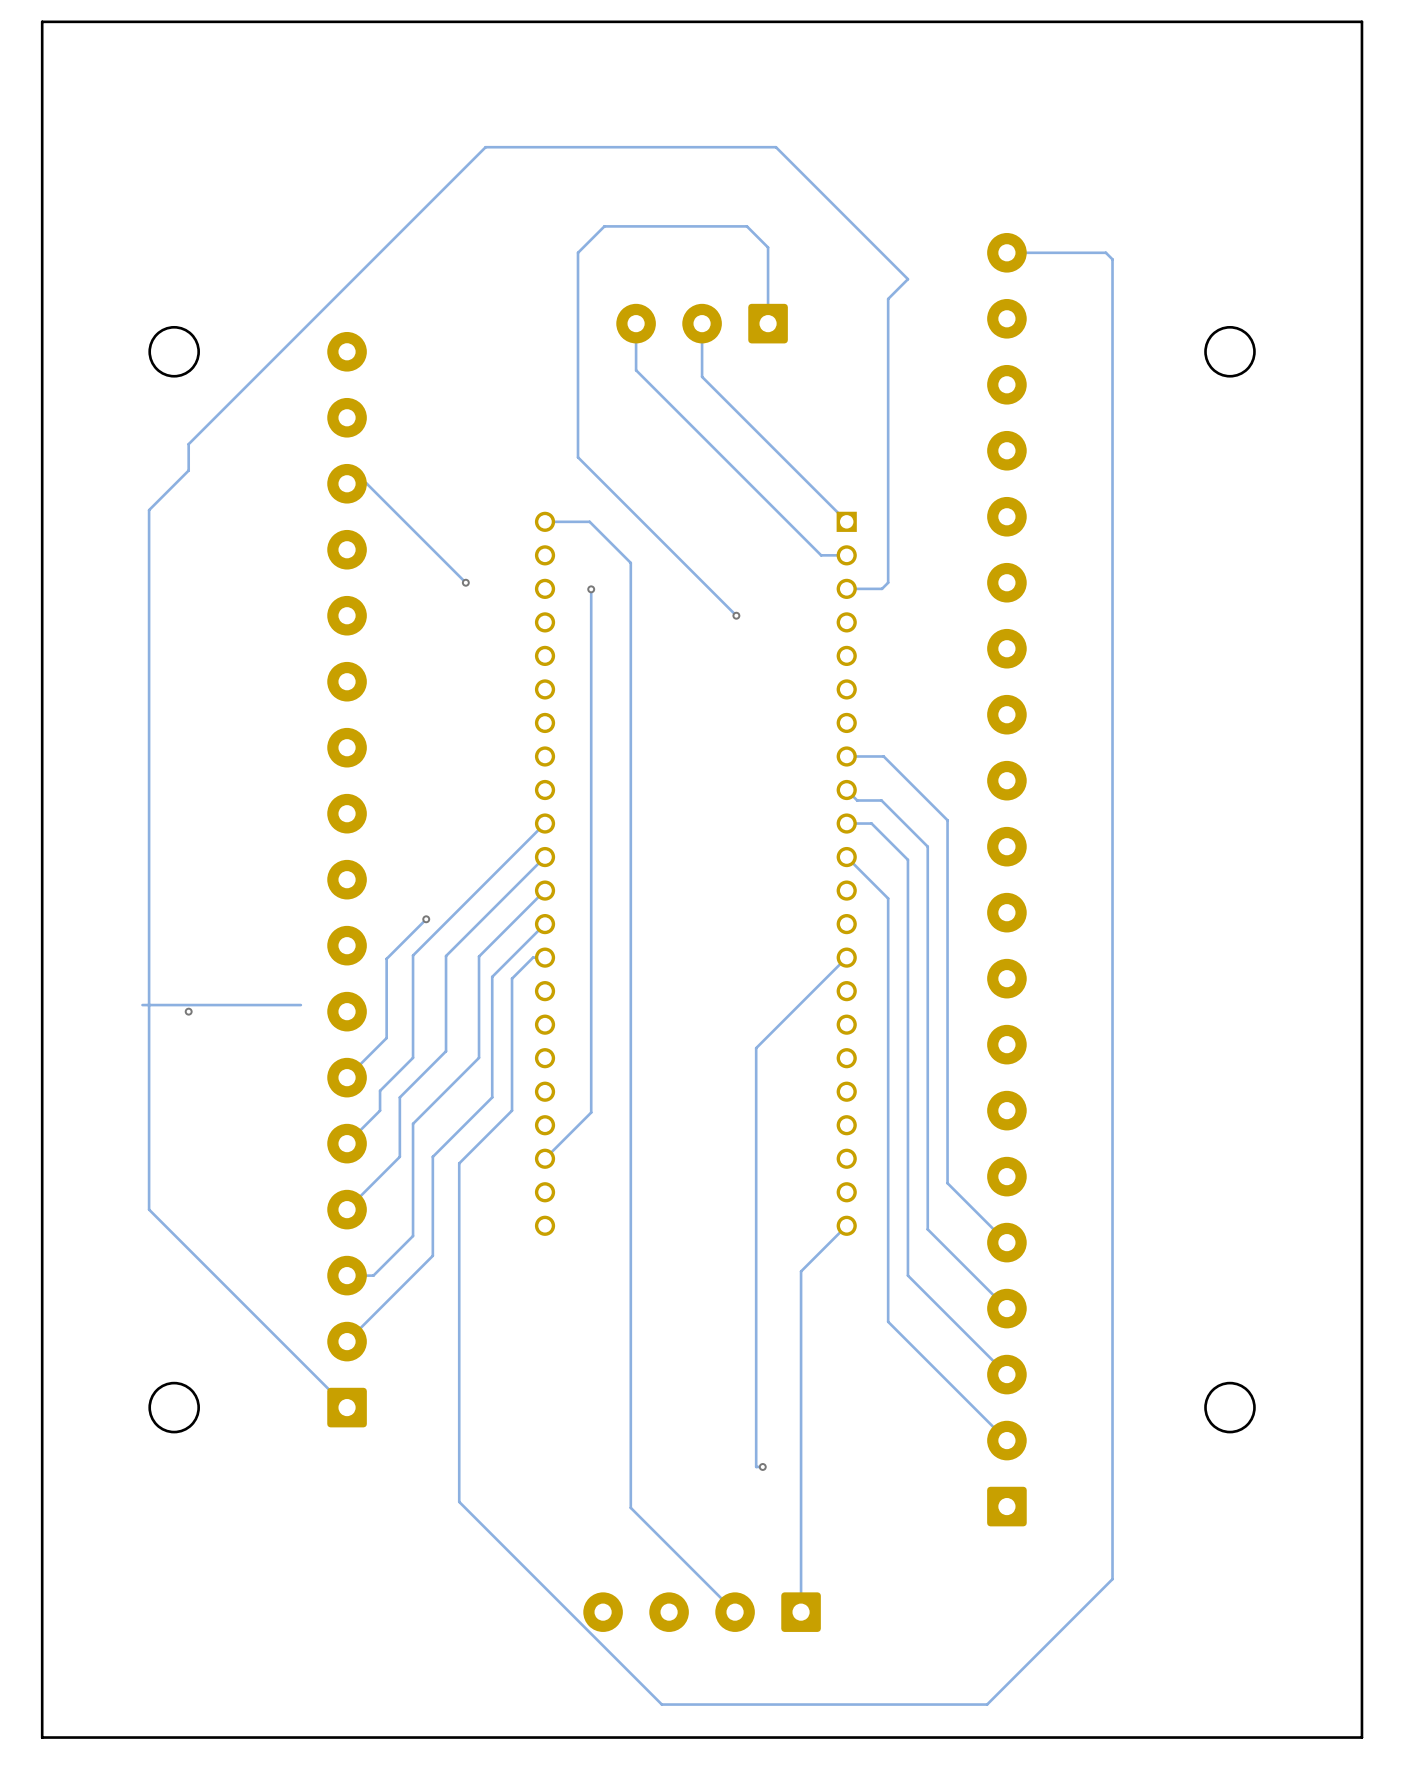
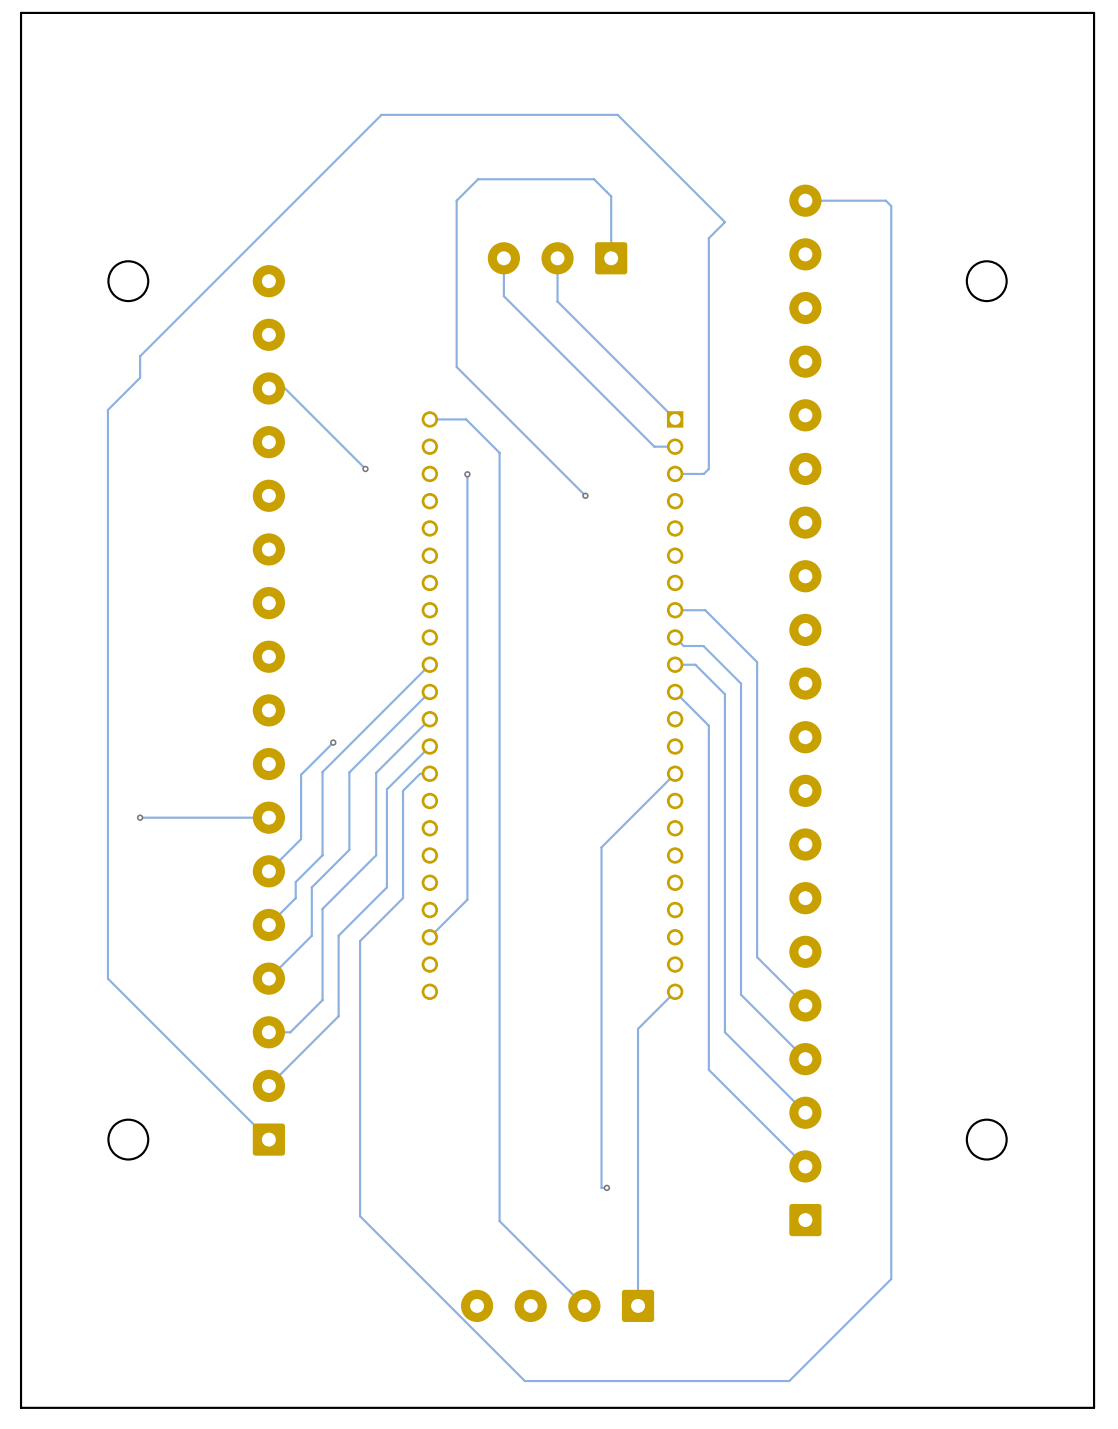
track: (300, 1005) (142, 1005) -> (268, 817) (140, 817)

